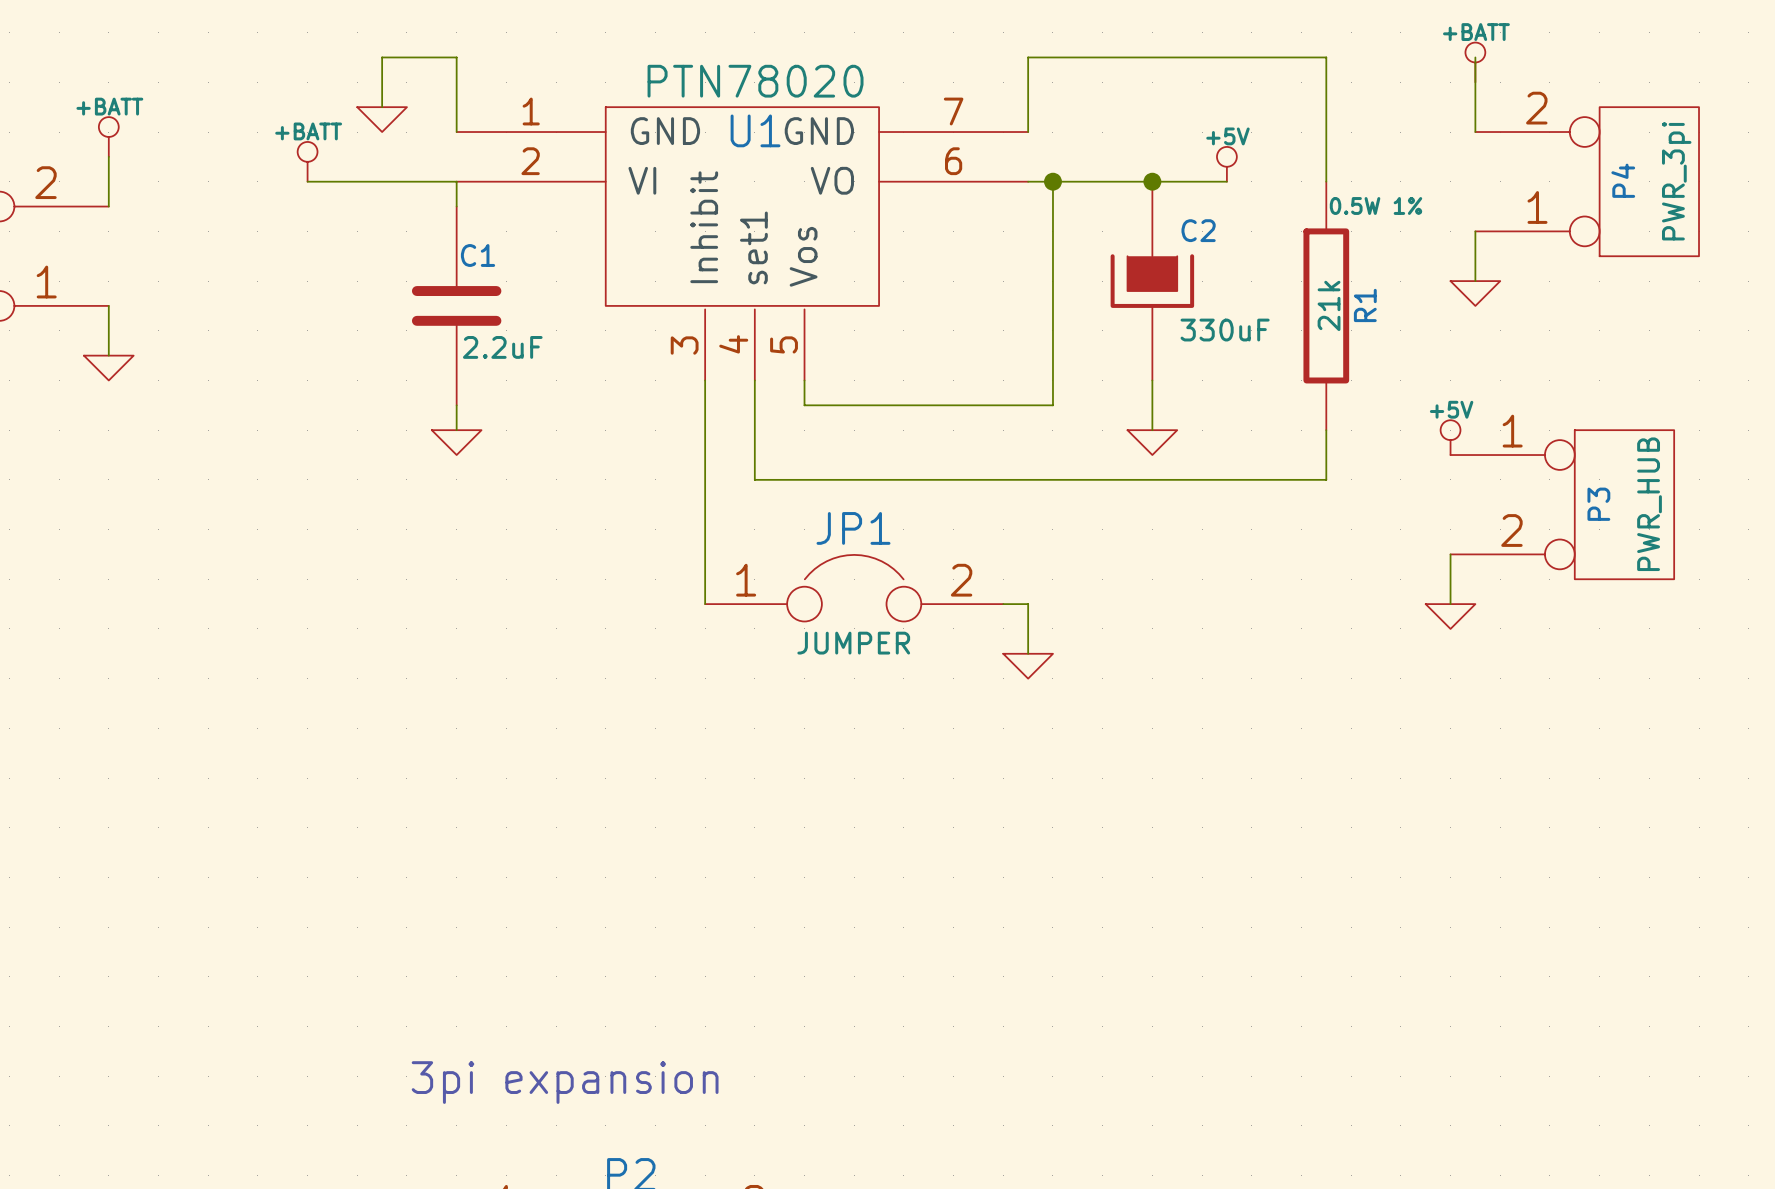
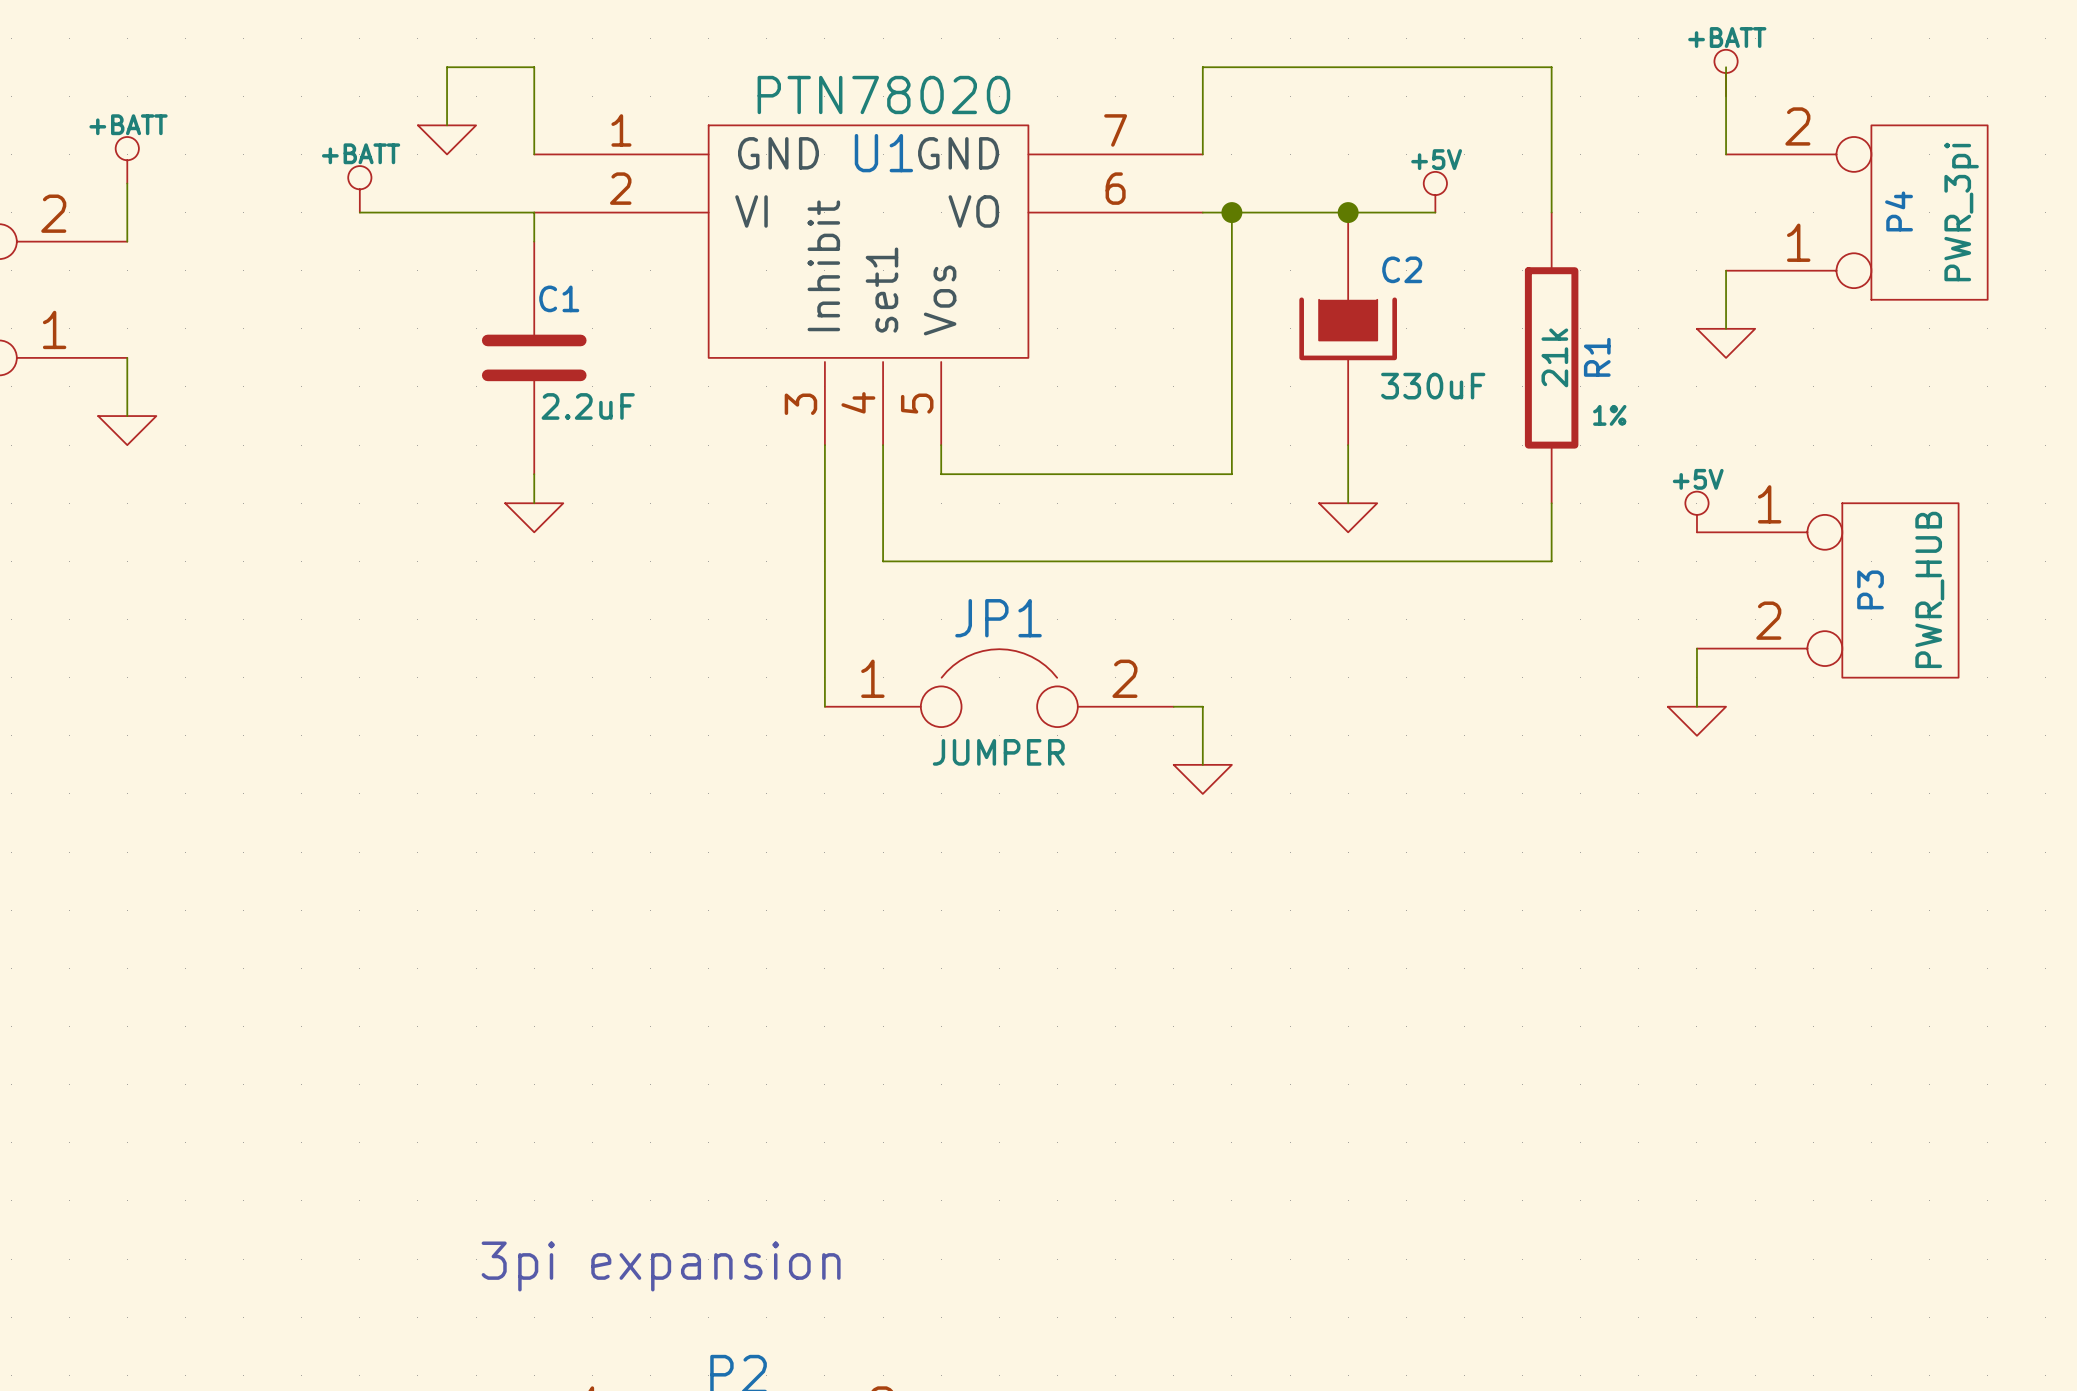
R1 text: 0.5W 1% (1376, 205) -> 1% (1609, 415)

